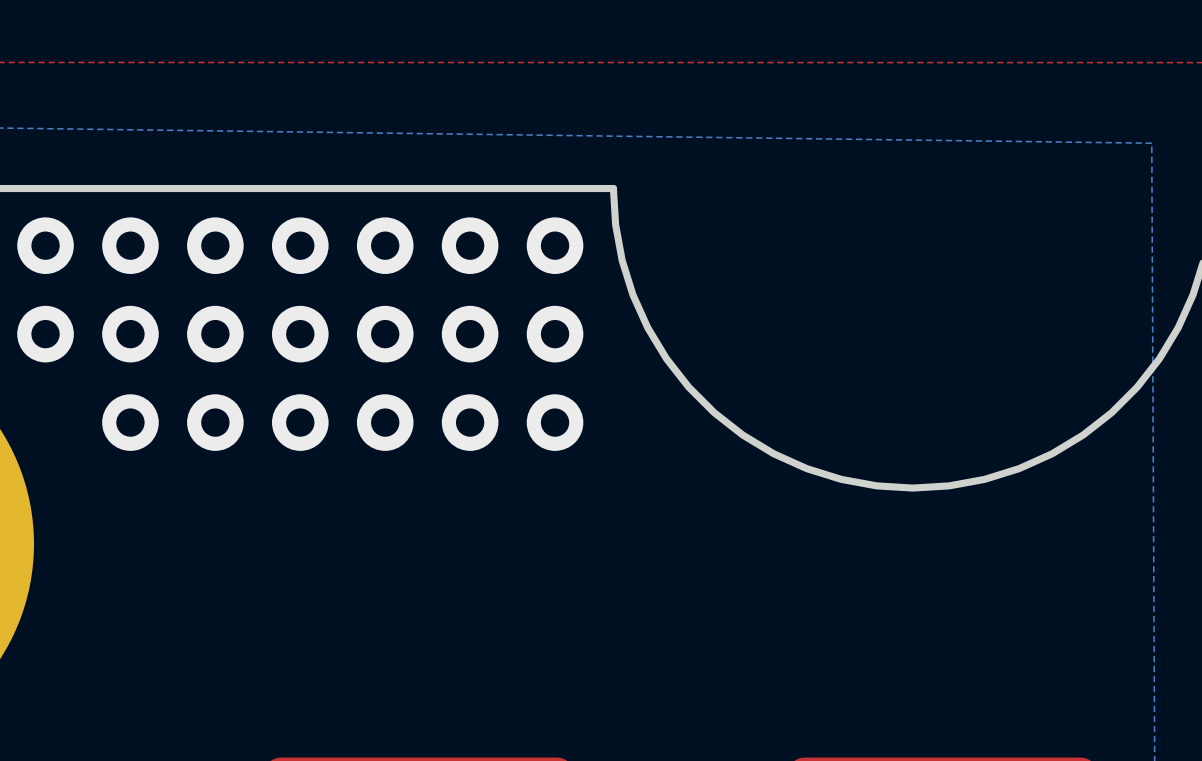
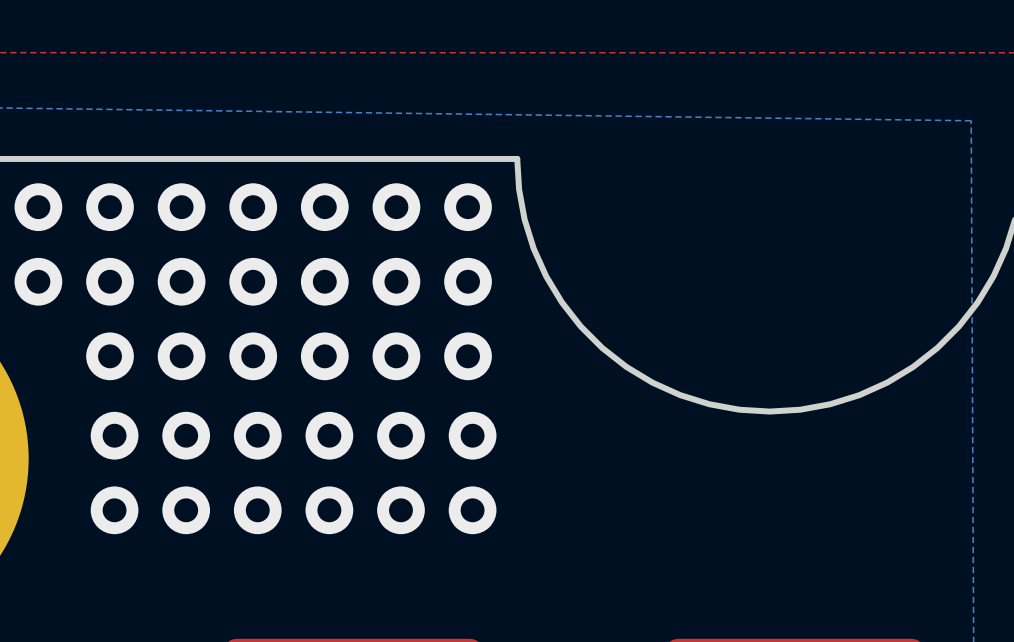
via: none -> (114, 435)
via: none -> (186, 435)
via: none -> (257, 435)
via: none -> (329, 435)
via: none -> (400, 435)
via: none -> (472, 435)
via: none -> (114, 510)
via: none -> (186, 510)
via: none -> (257, 510)
via: none -> (329, 510)
via: none -> (400, 510)
via: none -> (472, 510)

